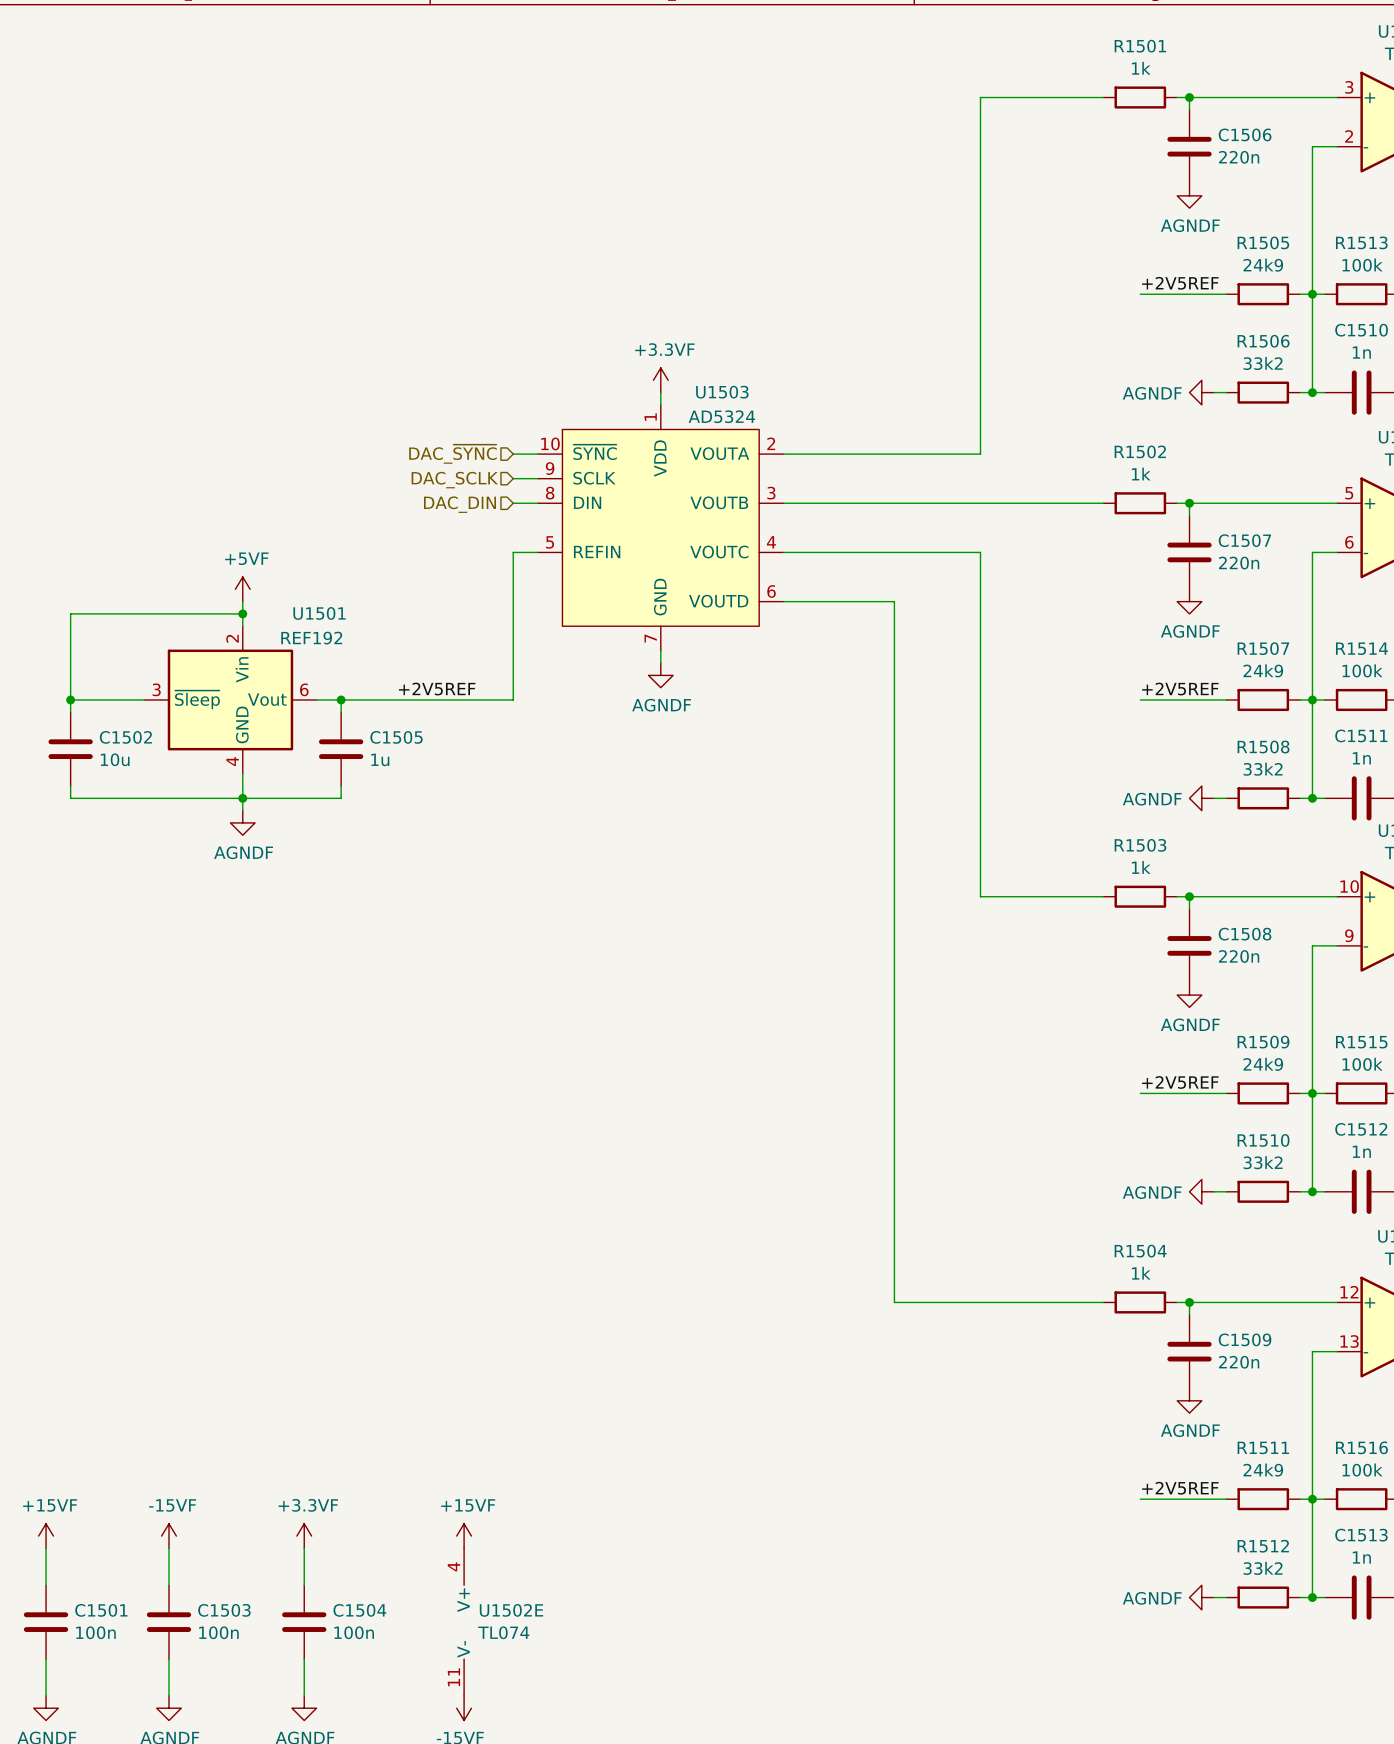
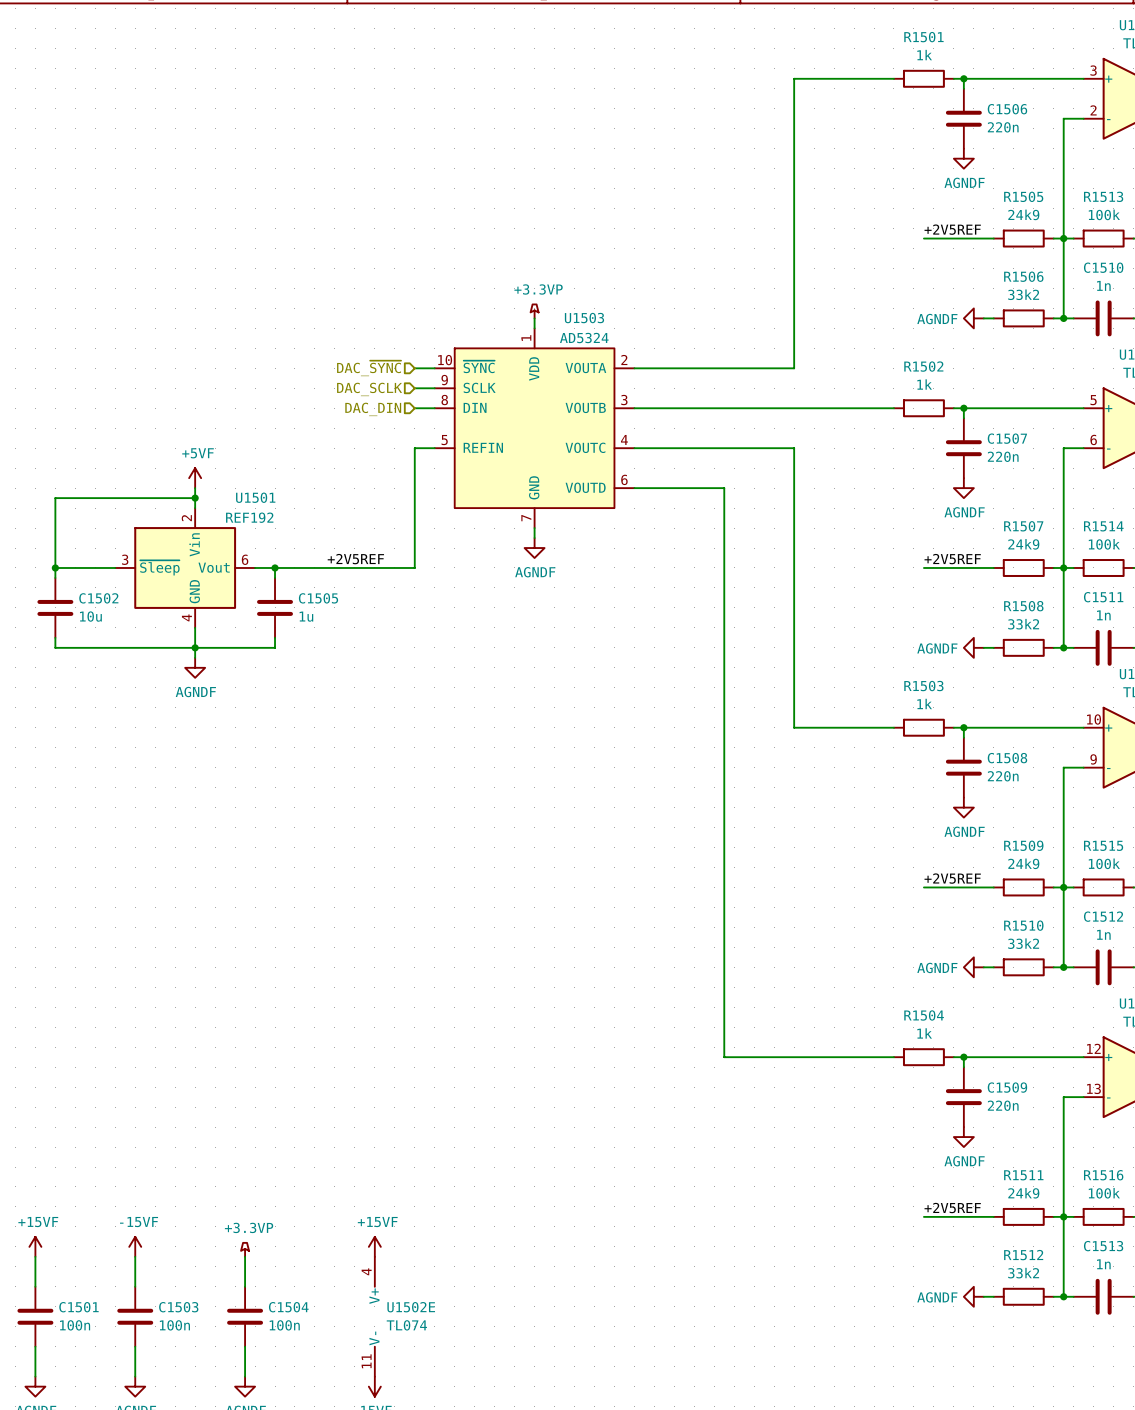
power symbol: +3.3VF (660, 380) -> +3.3VP (534, 311)
power symbol: +3.3VF (304, 1536) -> +3.3VP (245, 1249)

